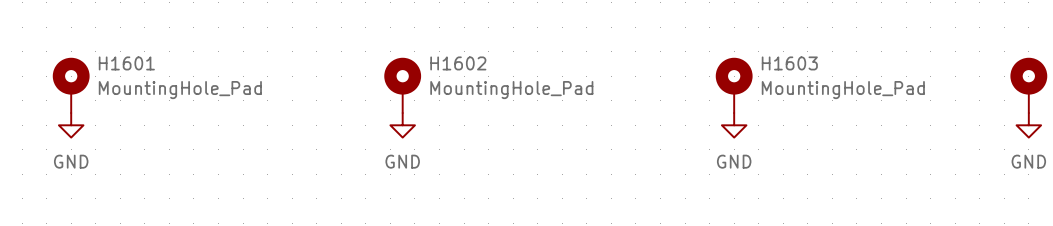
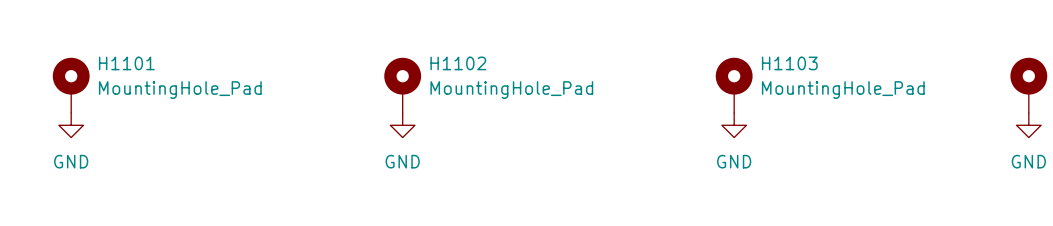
H1601 name: H1601 (126, 63) -> H1101 (126, 63)
H1602 name: H1602 (458, 63) -> H1102 (458, 63)
H1603 name: H1603 (789, 63) -> H1103 (789, 63)

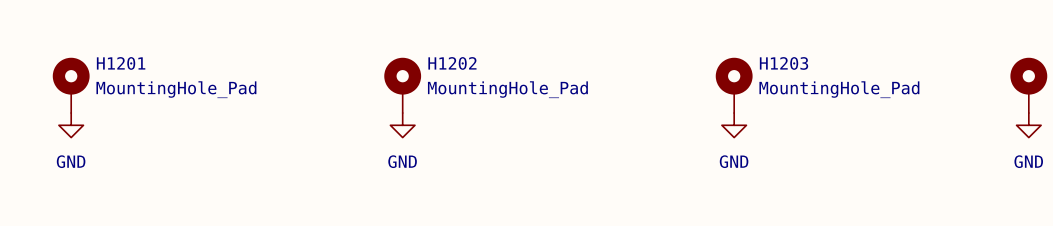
H1101 name: H1101 (126, 63) -> H1201 (121, 63)
H1102 name: H1102 (458, 63) -> H1202 (452, 63)
H1103 name: H1103 (789, 63) -> H1203 (784, 63)

